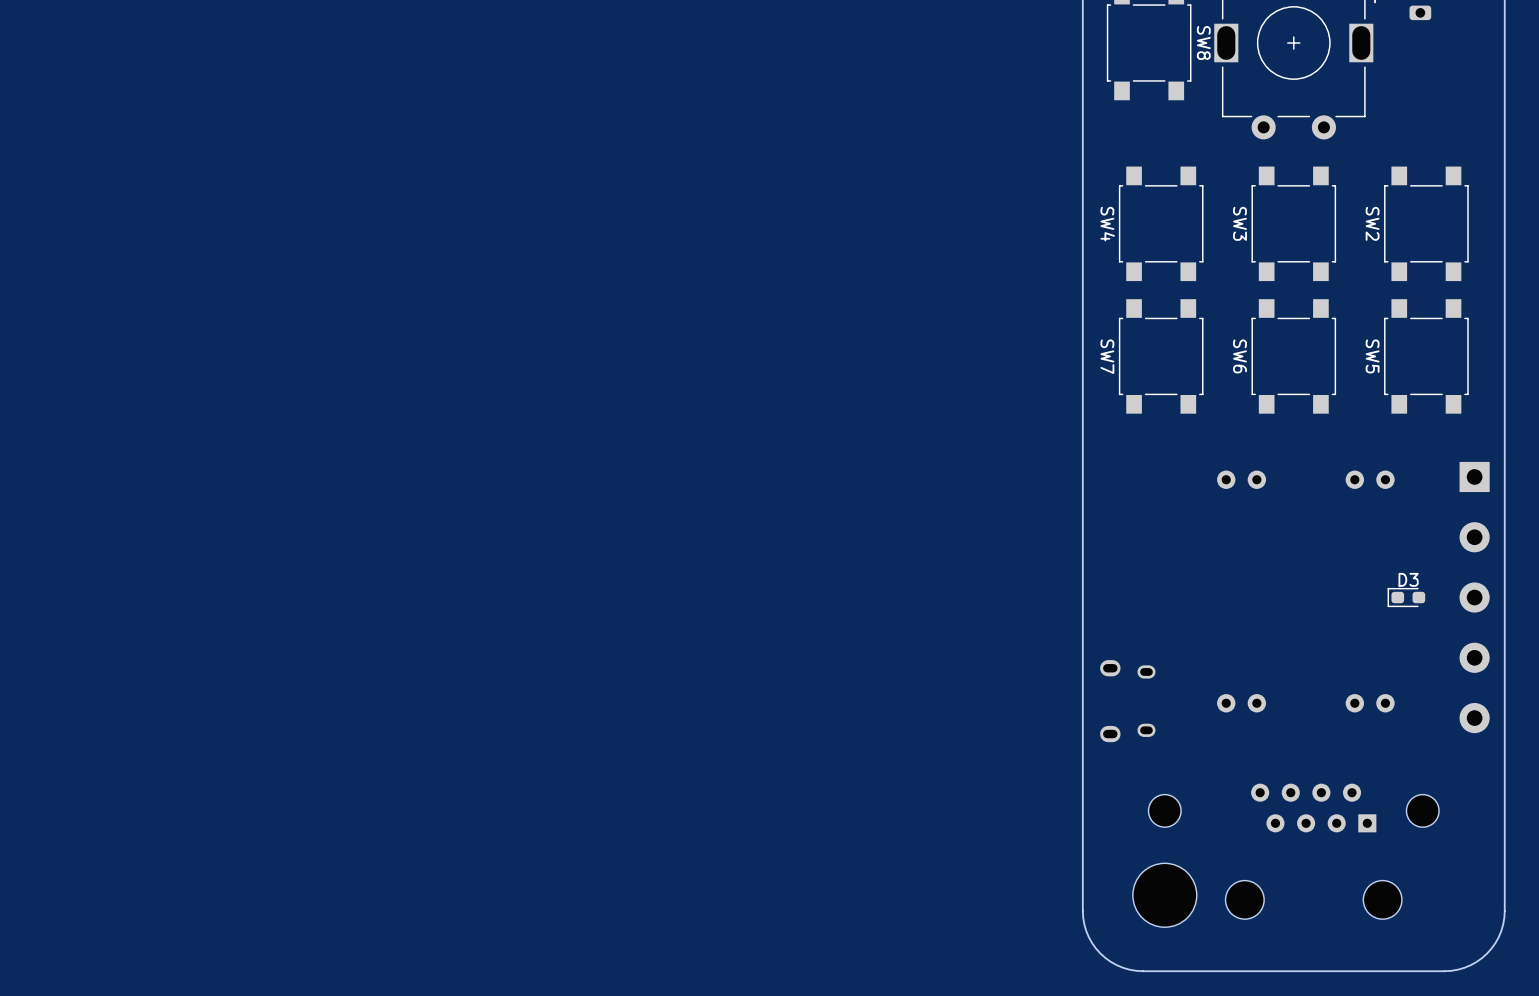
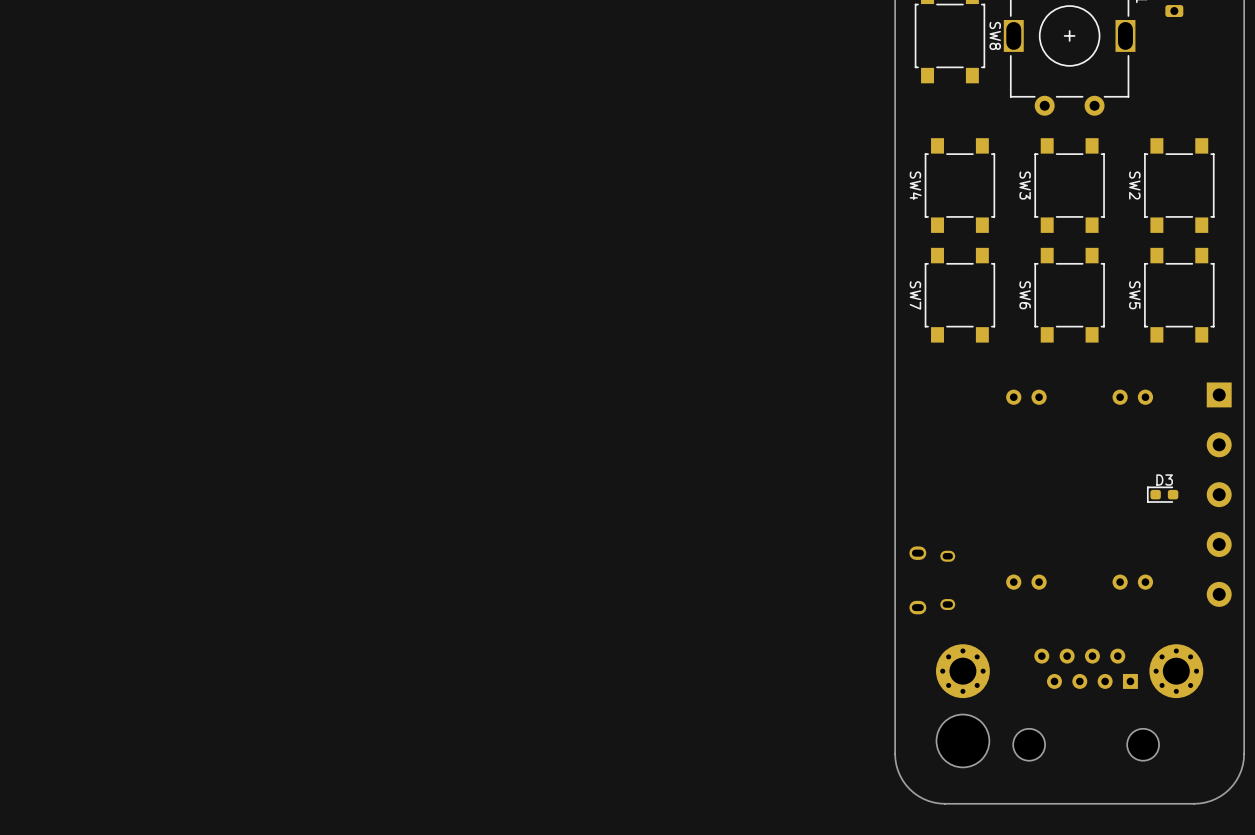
part footprint: [1148, 794, 1182, 828] -> [936, 644, 990, 699]
part footprint: [1406, 794, 1440, 828] -> [1149, 644, 1204, 699]

